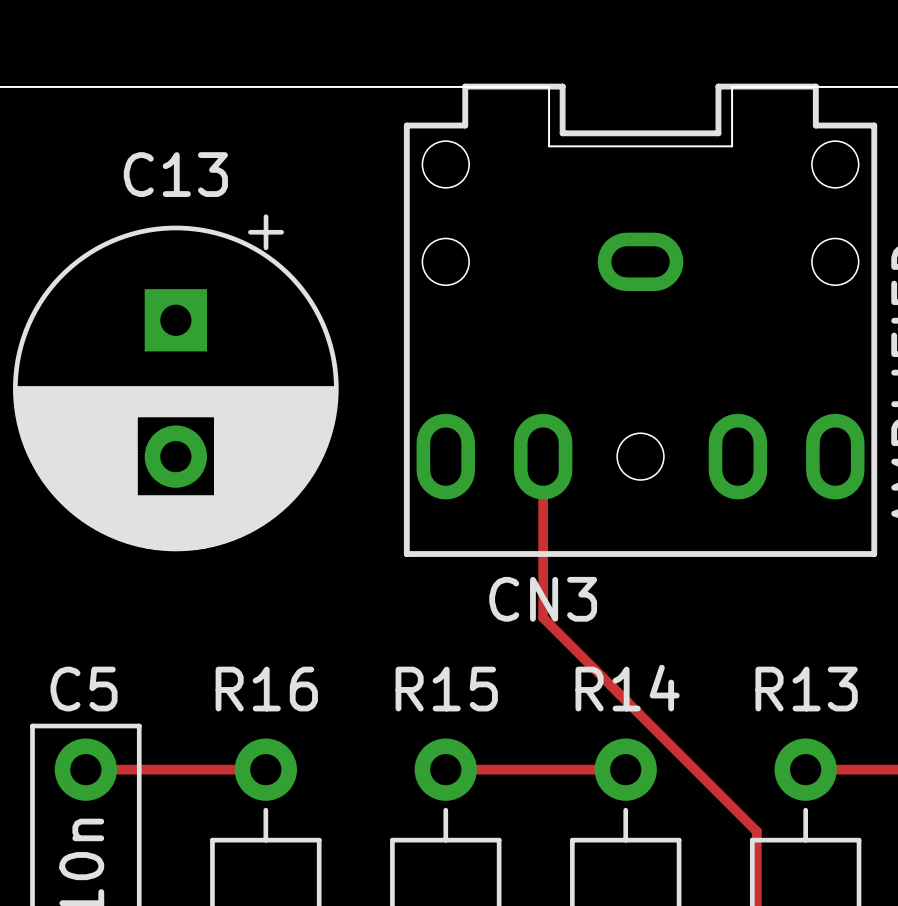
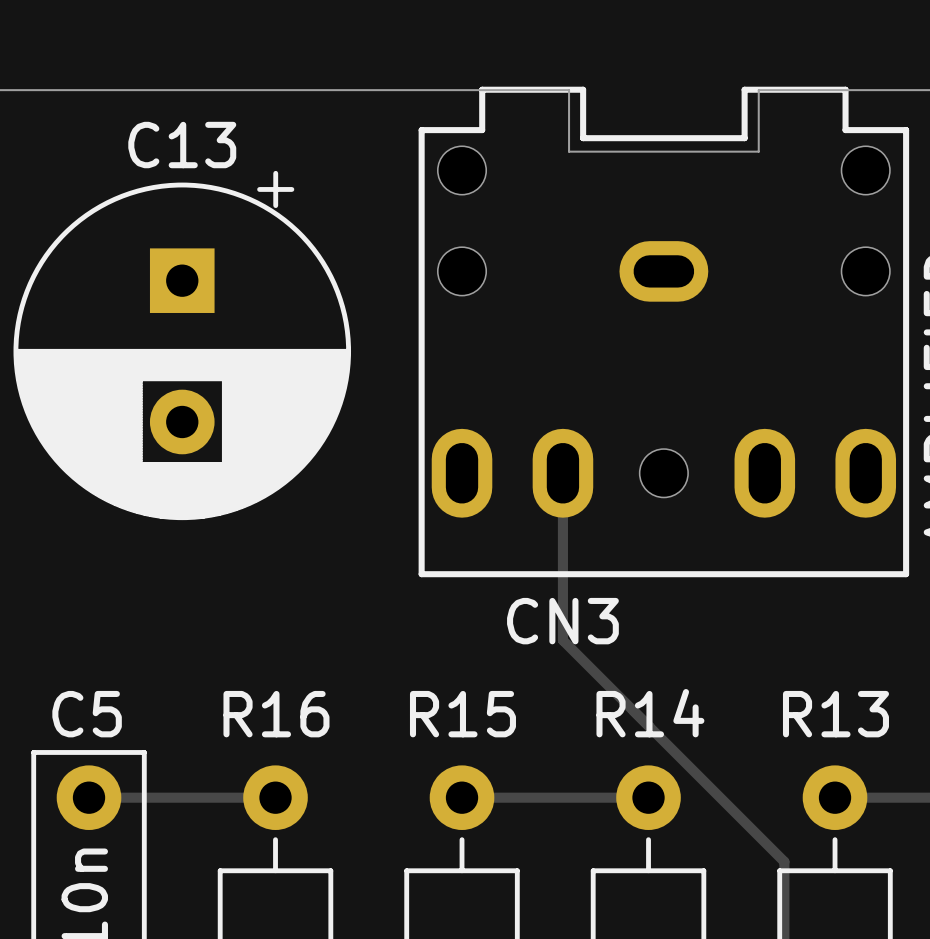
C13 name position: C13 (175, 174) -> C13 (182, 145)
C13 position: (175, 382) -> (182, 345)

